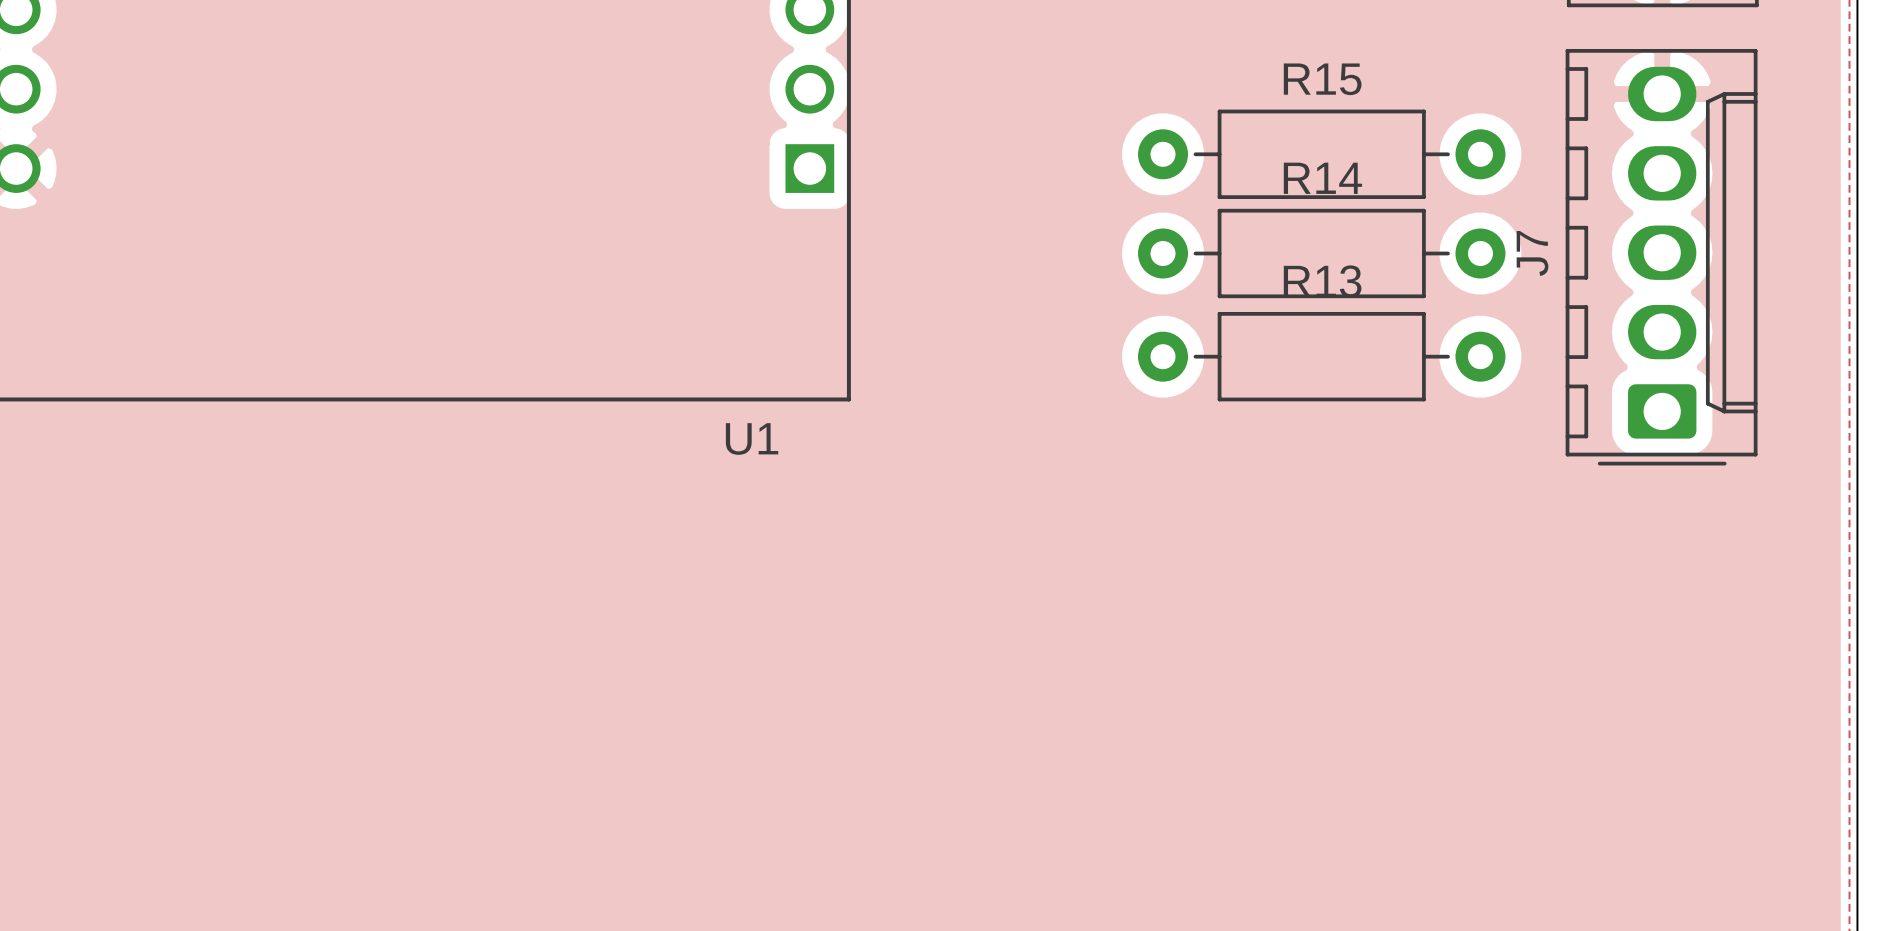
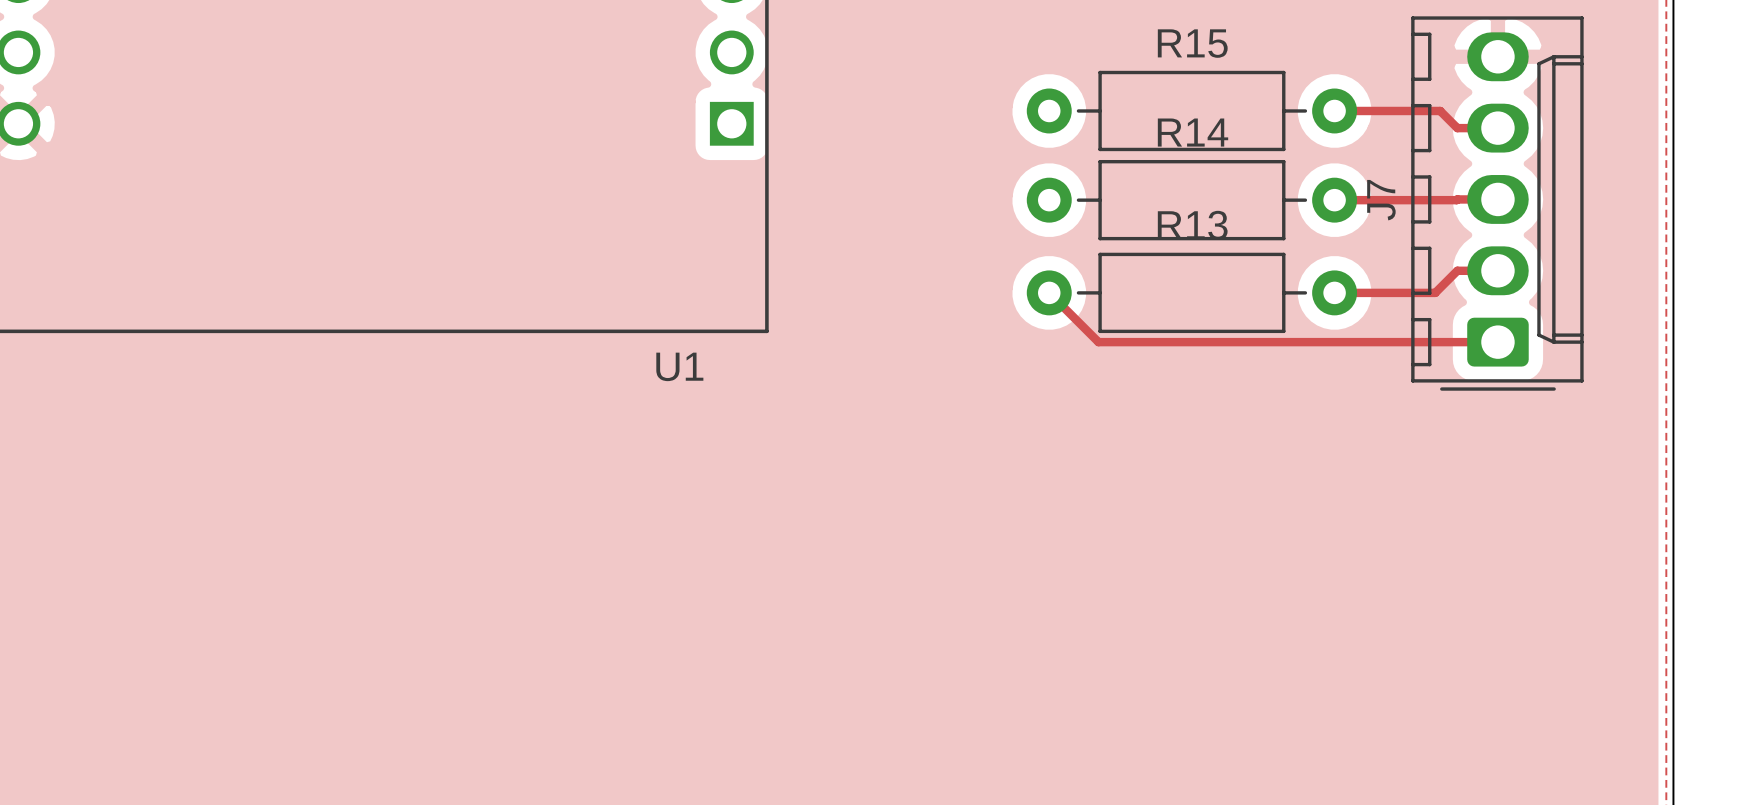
track: none -> (1334, 110) (1440, 110) (1457, 128) (1497, 128)
track: none -> (1497, 199) (1334, 200)
track: none -> (1497, 270) (1457, 270) (1435, 292) (1334, 292)
track: none -> (1049, 292) (1098, 342) (1497, 342)

